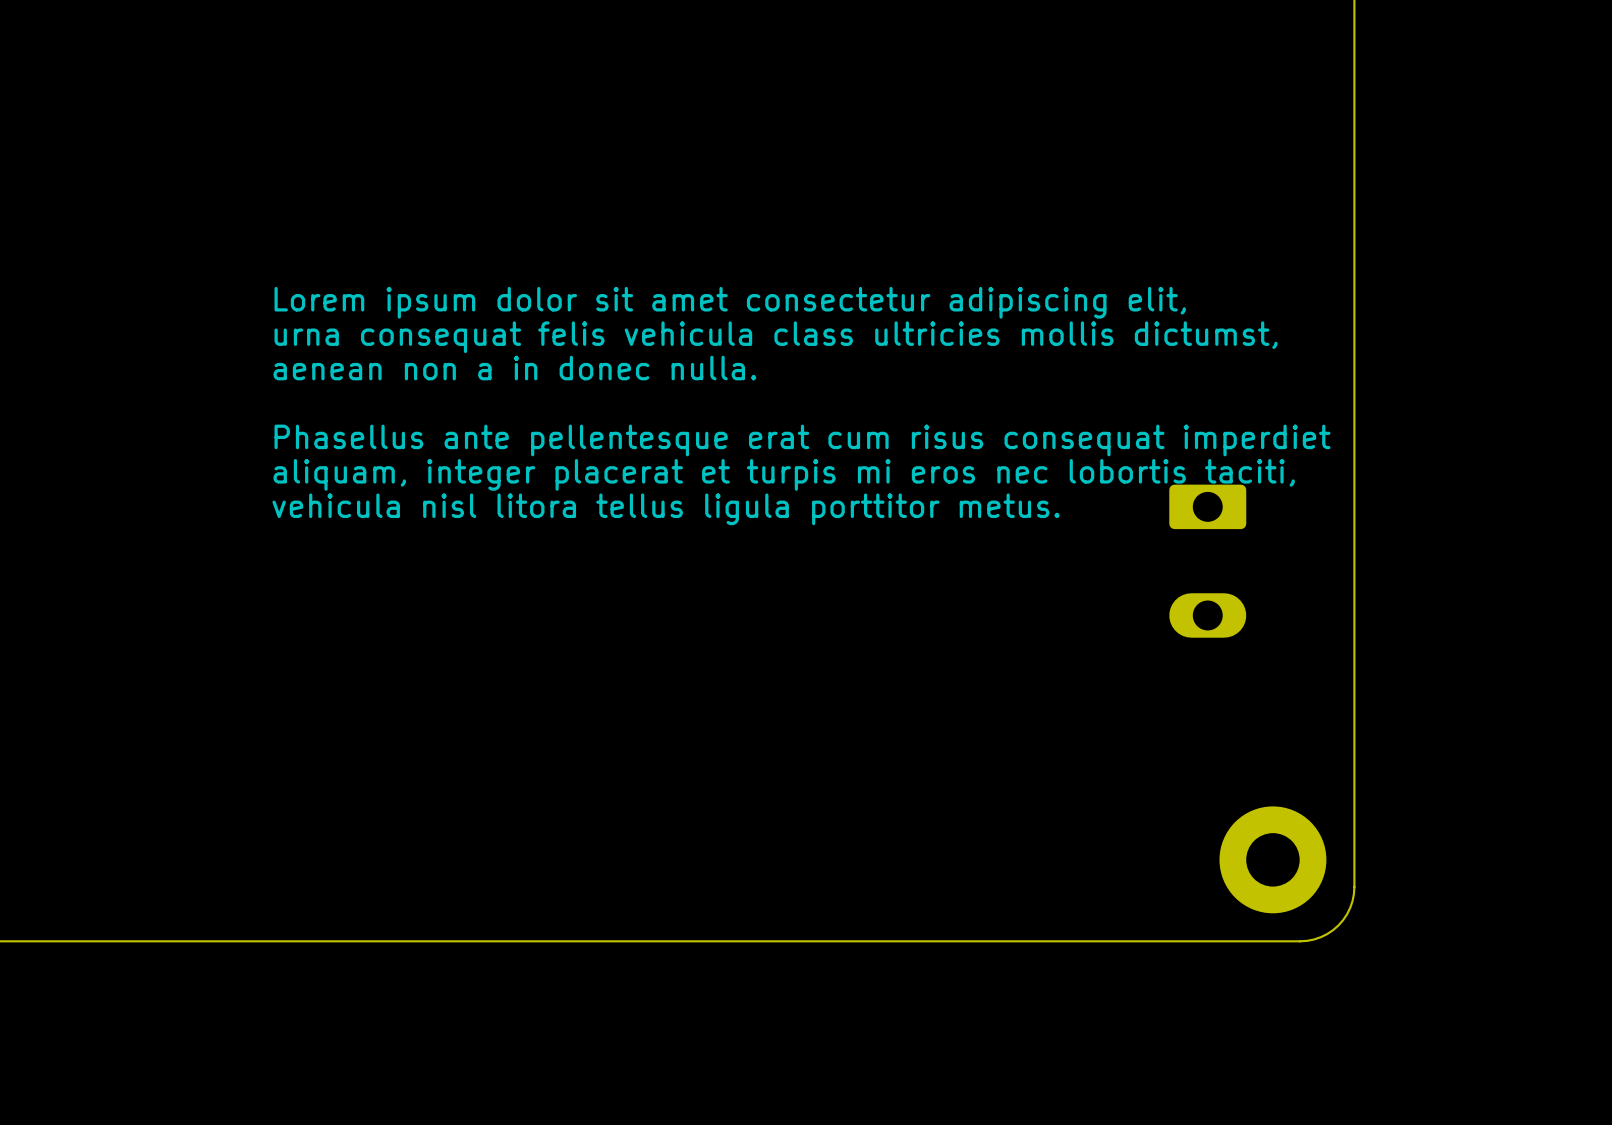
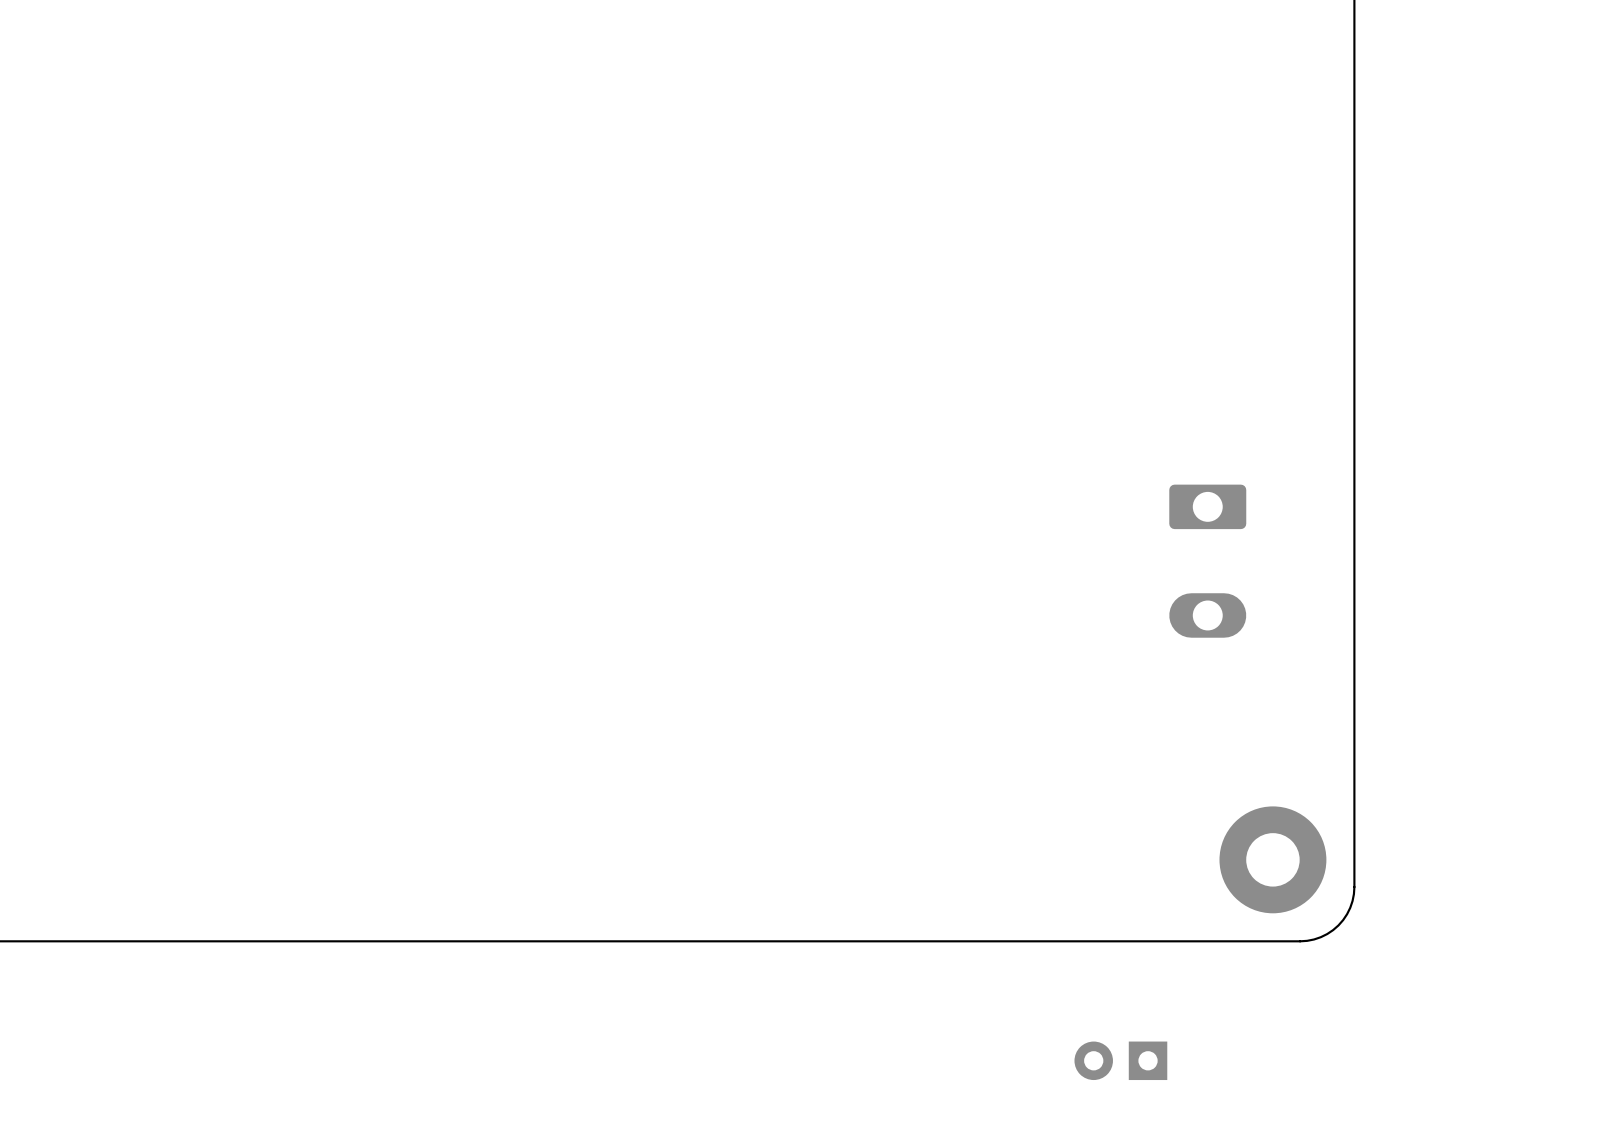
text: Lorem ipsum dolor sit amet consectetur adipiscing elit, (730, 302) -> none
text: urna consequat felis vehicula class ultricies mollis dictumst, (776, 337) -> none
text: aenean non a in donec nulla. (514, 368) -> none
text: Phasellus ante pellentesque erat cum risus consequat imperdiet (802, 440) -> none
text: aliquam, integer placerat et turpis mi eros nec lobortis taciti, (784, 474) -> none
text: vehicula nisl litora tellus ligula porttitor metus. (666, 509) -> none
part: none -> (1120, 1060)

